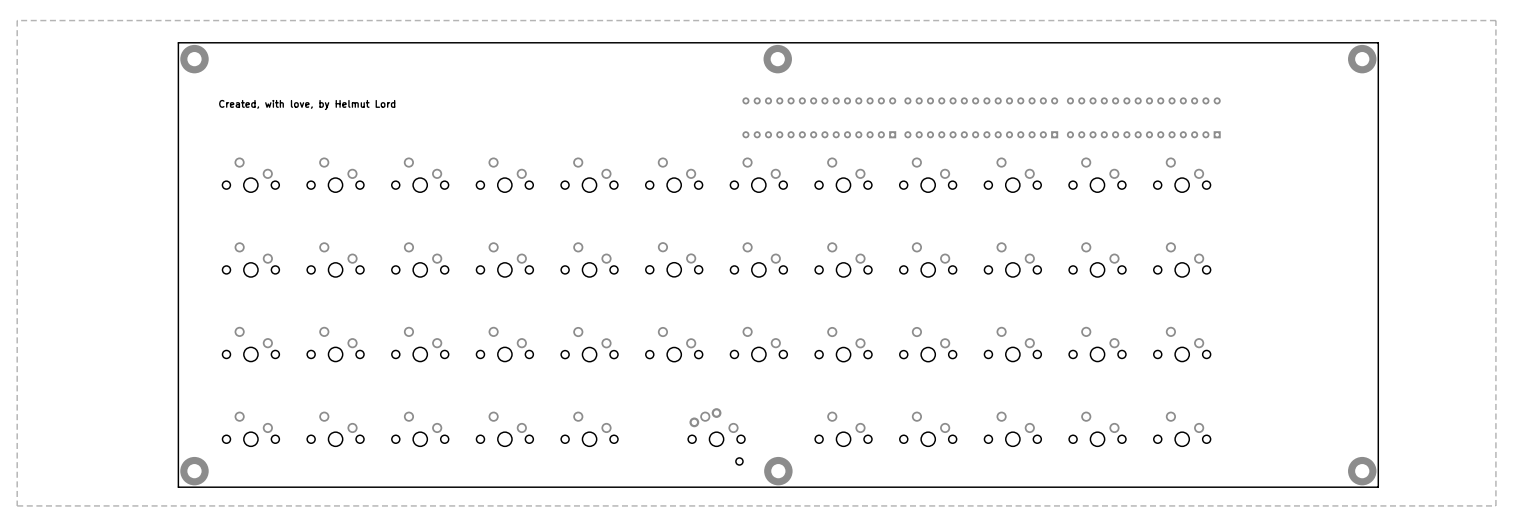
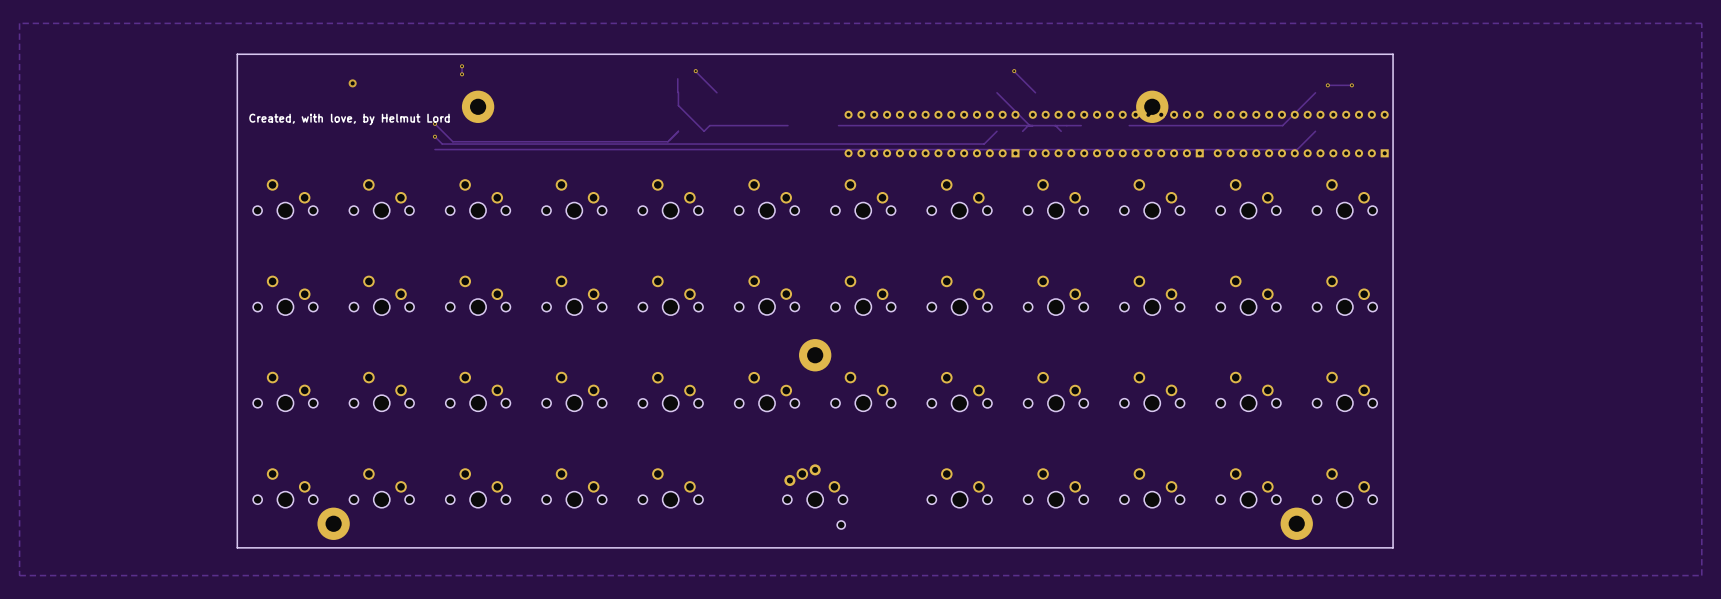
board edge: (1378, 42) (178, 42) (178, 487) (1378, 487) (1378, 42) -> (1393, 54) (1393, 547) (237, 547) (237, 54) (1393, 54)
track: none -> (462, 66) (462, 74)
via: none -> (462, 66)
part: (194, 59) -> none
part: (777, 59) -> none
part: (1362, 59) -> none
track: none -> (695, 71) (716, 92)
via: none -> (695, 71)
track: none -> (1014, 71) (1035, 92)
via: none -> (1014, 71)
via: none -> (462, 74)
track: none -> (677, 78) (678, 105) (704, 131) (709, 125) (787, 125)
via: none -> (352, 83)
via: none -> (1327, 85)
track: none -> (1351, 85) (1327, 85)
via: none -> (1351, 85)
track: none -> (996, 92) (1029, 125)
track: none -> (1315, 92) (1282, 125) (1129, 125)
part: none -> (478, 106)
part: none -> (1152, 106)
track: none -> (434, 123) (452, 141) (667, 141) (678, 131)
via: none -> (434, 123)
track: none -> (1028, 125) (1022, 131)
track: none -> (1055, 125) (1061, 131)
track: none -> (1081, 125) (838, 125)
track: none -> (996, 131) (984, 144) (442, 144) (434, 136)
track: none -> (1315, 131) (1297, 149) (434, 149)
via: none -> (434, 136)
part: none -> (815, 355)
part: none -> (1296, 523)
part position: (194, 471) -> (333, 523)
part: (778, 471) -> none
part: (1362, 471) -> none

